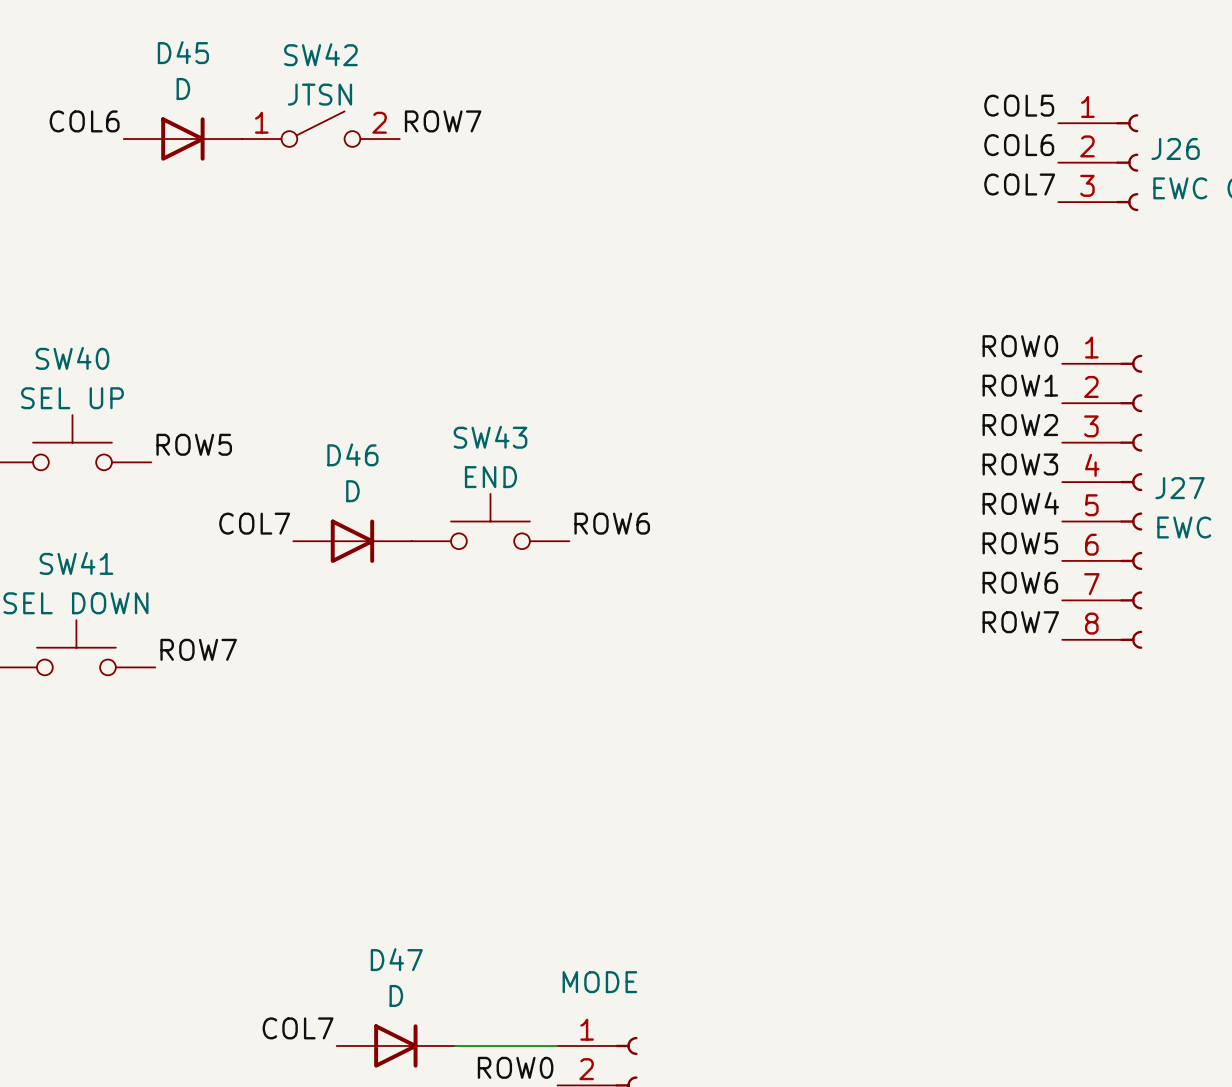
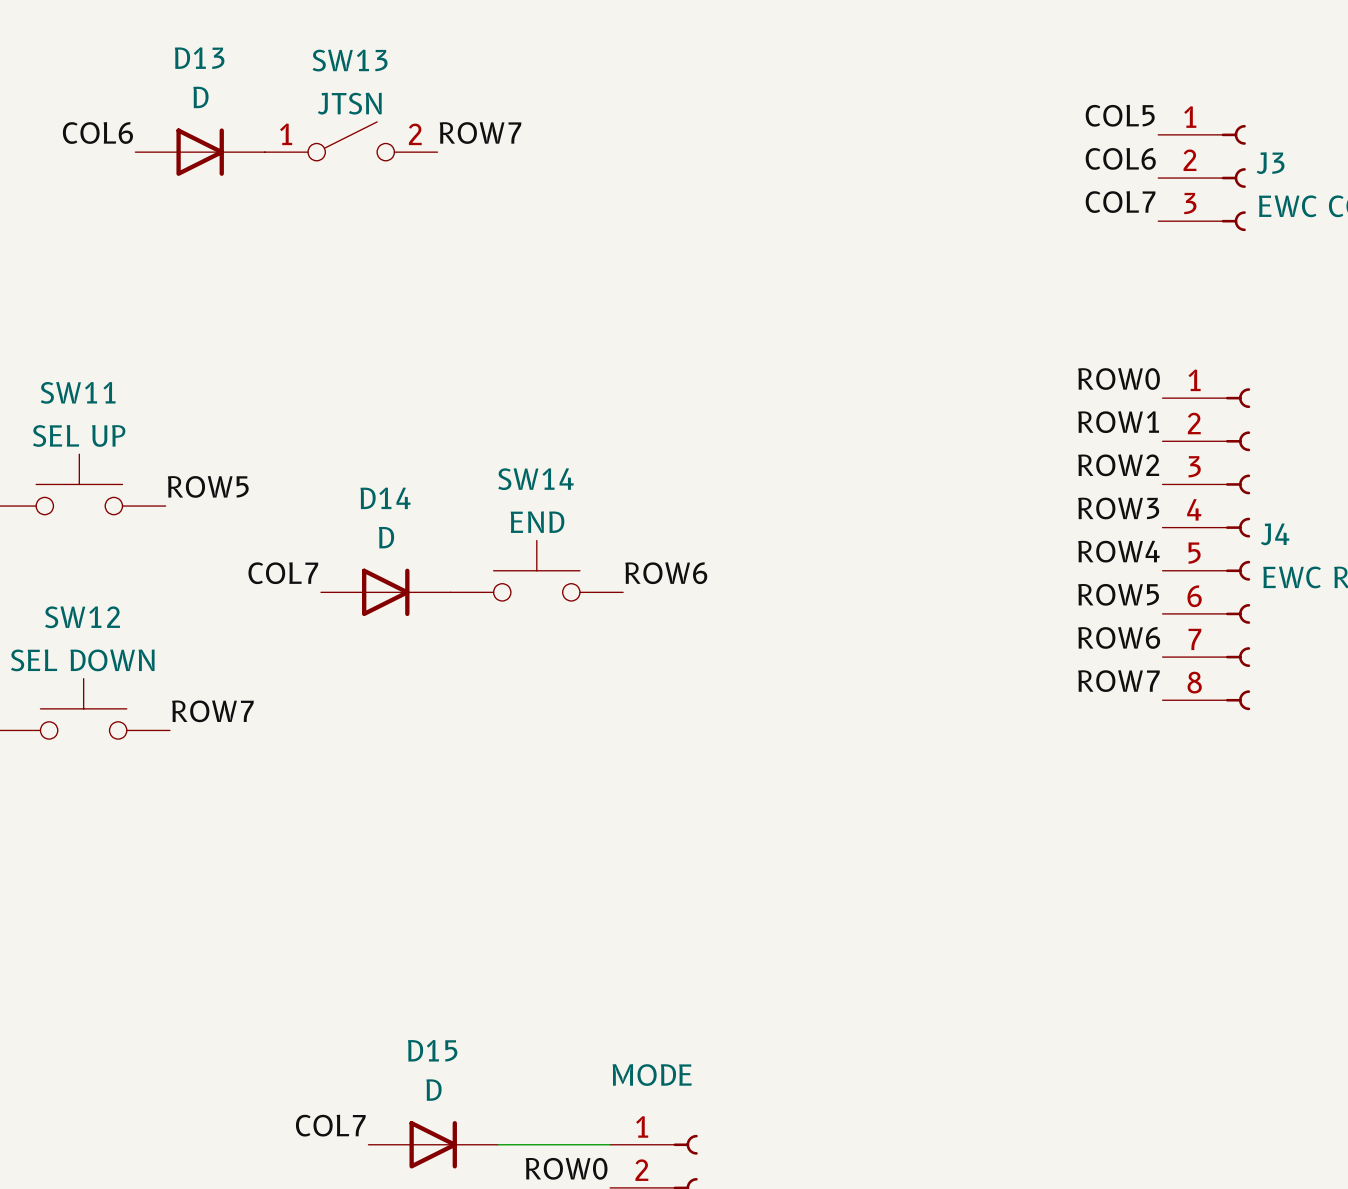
D45 name: D45 (183, 52) -> D13 (199, 58)
SW42 name: SW42 (320, 54) -> SW13 (350, 60)
J26 name: J26 (1175, 148) -> J3 (1270, 163)
SW40 name: SW40 (72, 358) -> SW11 (78, 392)
SW43 name: SW43 (490, 437) -> SW14 (535, 479)
D46 name: D46 (352, 454) -> D14 (385, 498)
J27 name: J27 (1180, 488) -> J4 (1275, 534)
SW41 name: SW41 (76, 563) -> SW12 (82, 617)
D47 name: D47 (396, 959) -> D15 (432, 1050)

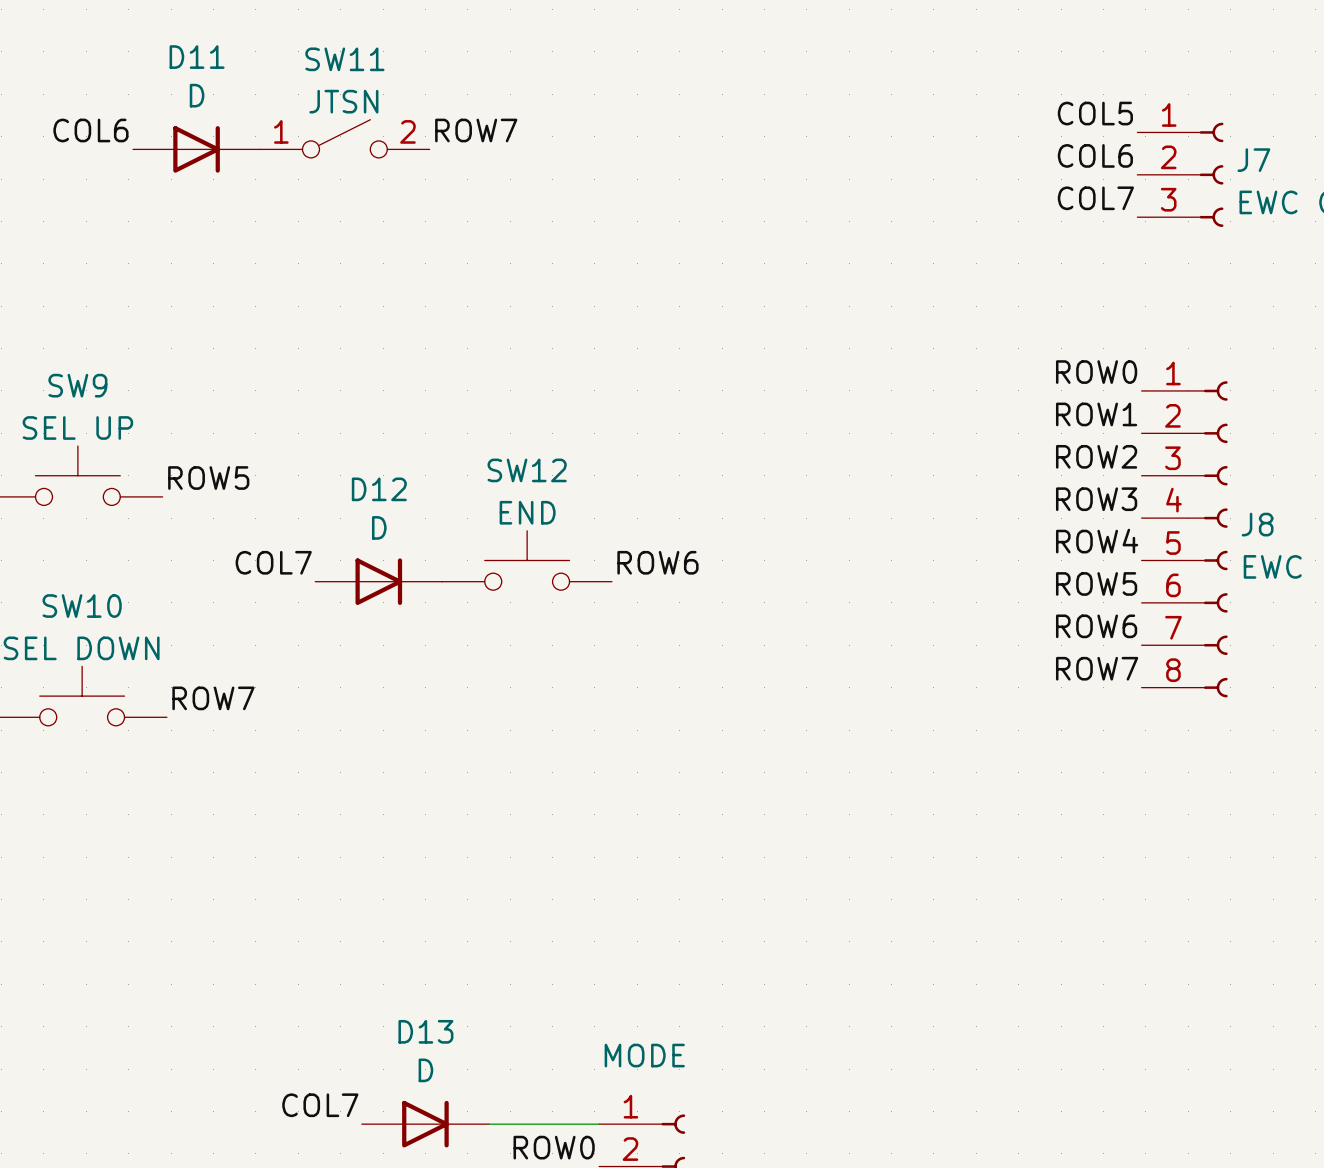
D13 name: D13 (199, 58) -> D11 (197, 57)
SW13 name: SW13 (350, 60) -> SW11 (344, 59)
J3 name: J3 (1270, 163) -> J7 (1253, 160)
SW11 name: SW11 (78, 392) -> SW9 (77, 385)
SW14 name: SW14 (535, 479) -> SW12 (527, 470)
D14 name: D14 (385, 498) -> D12 (379, 489)
J4 name: J4 (1275, 534) -> J8 (1257, 524)
SW12 name: SW12 (82, 617) -> SW10 (82, 606)
D15 name: D15 (432, 1050) -> D13 (425, 1031)

